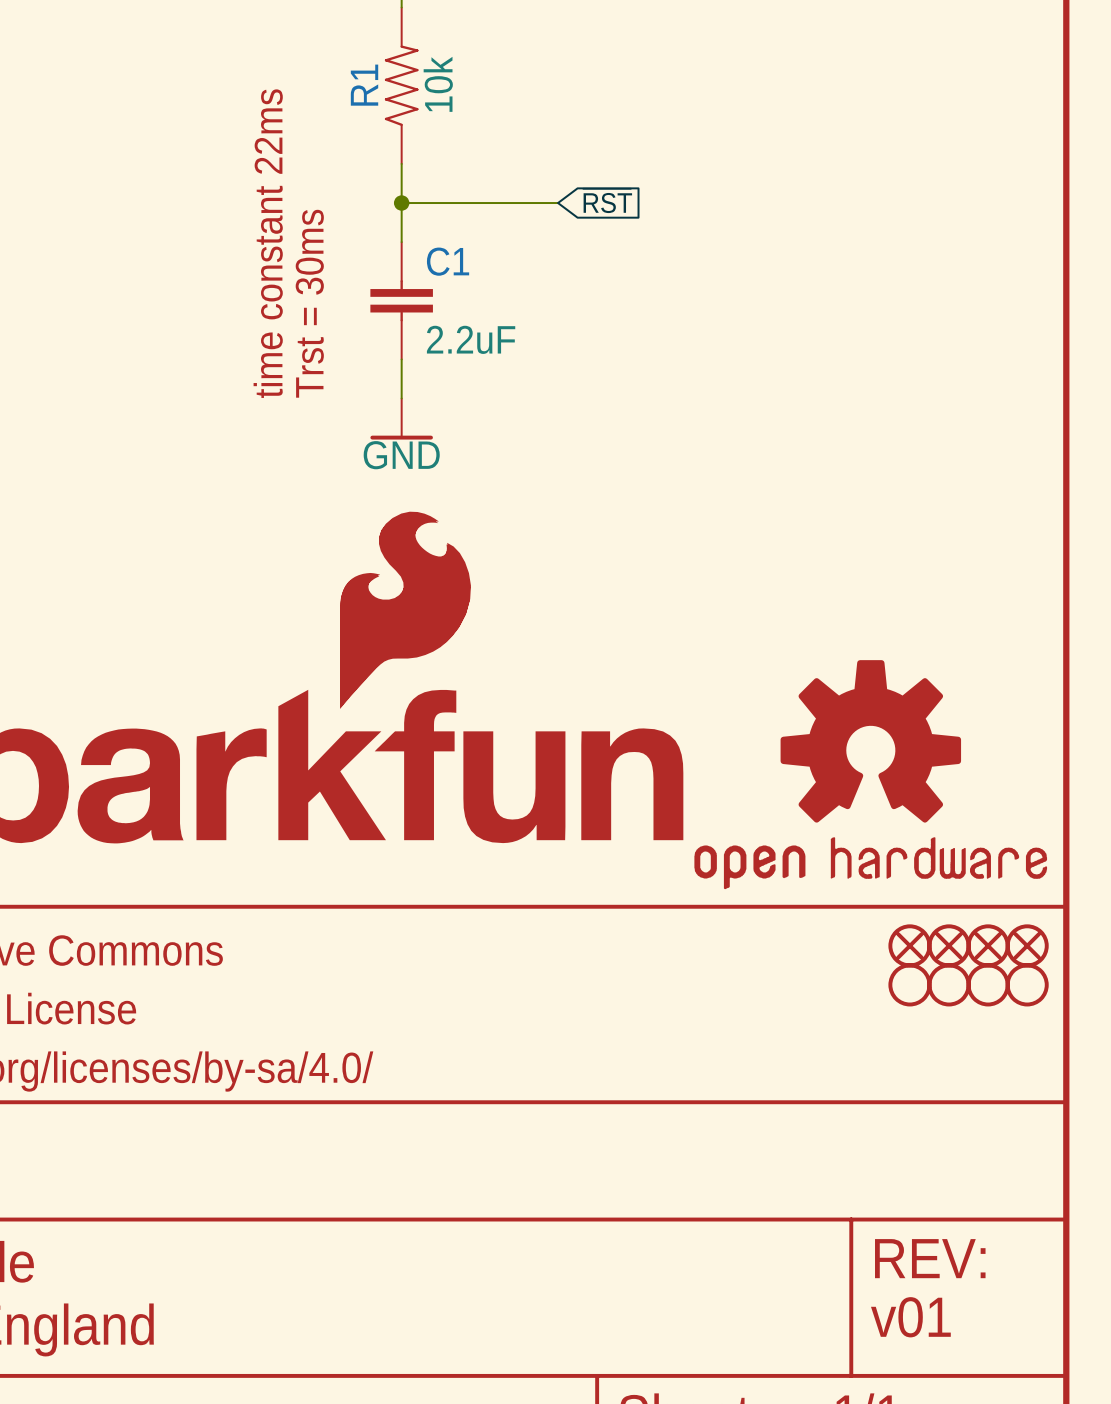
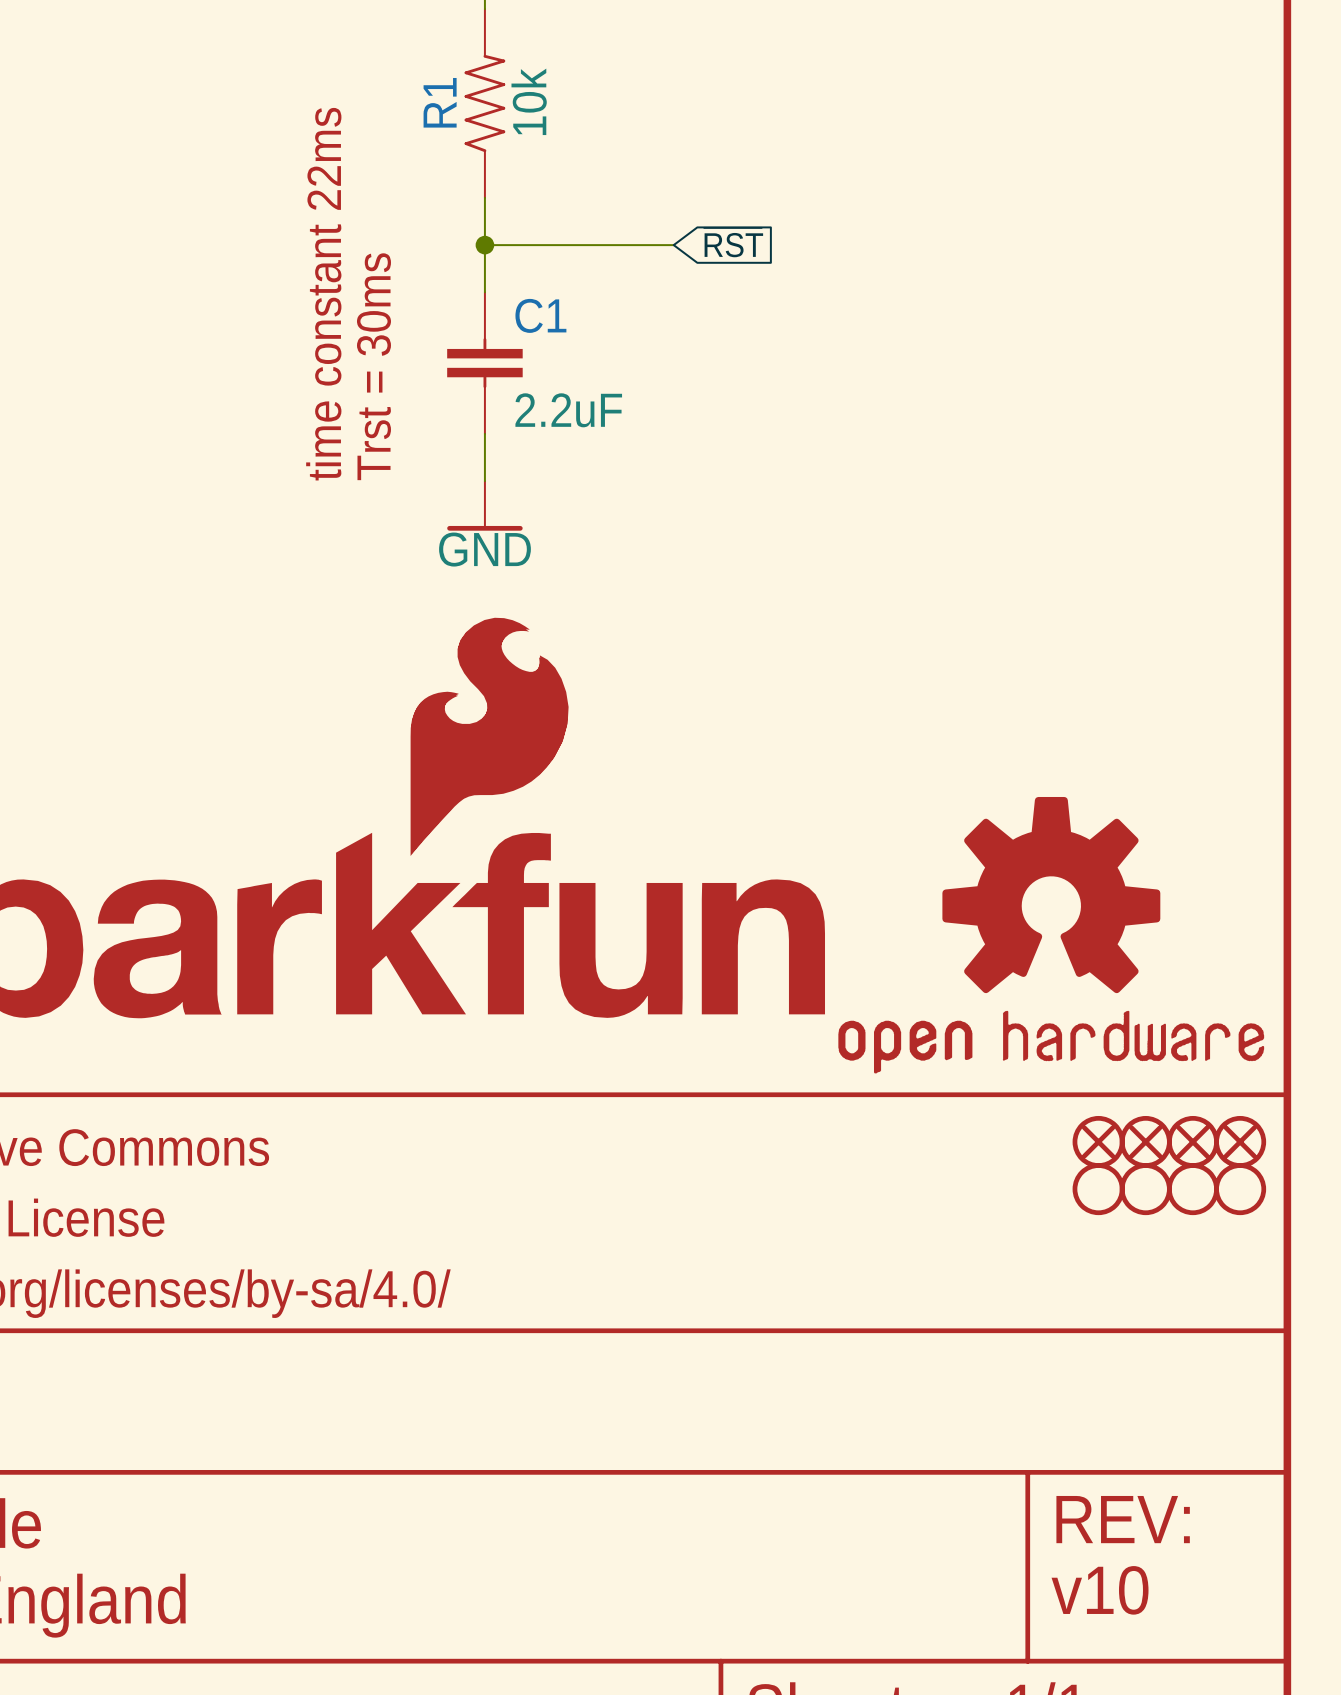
text: v01 (910, 1317) -> v10 (1100, 1590)

